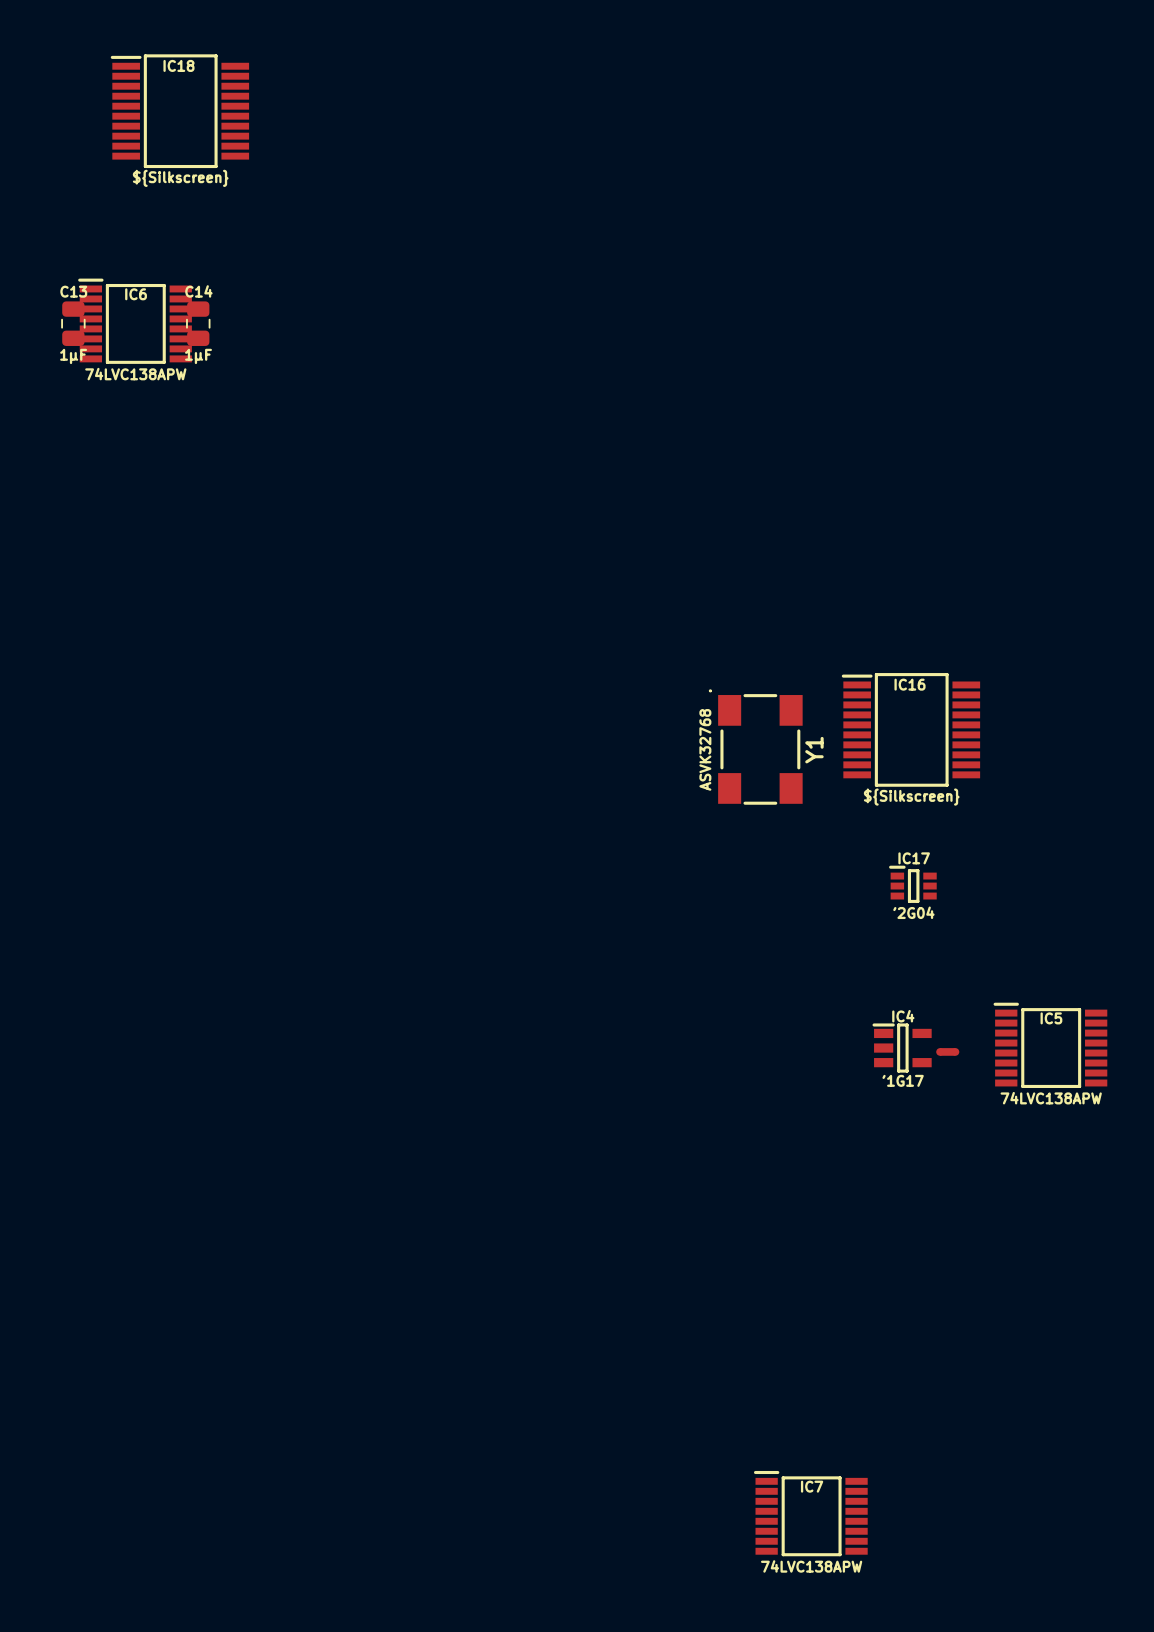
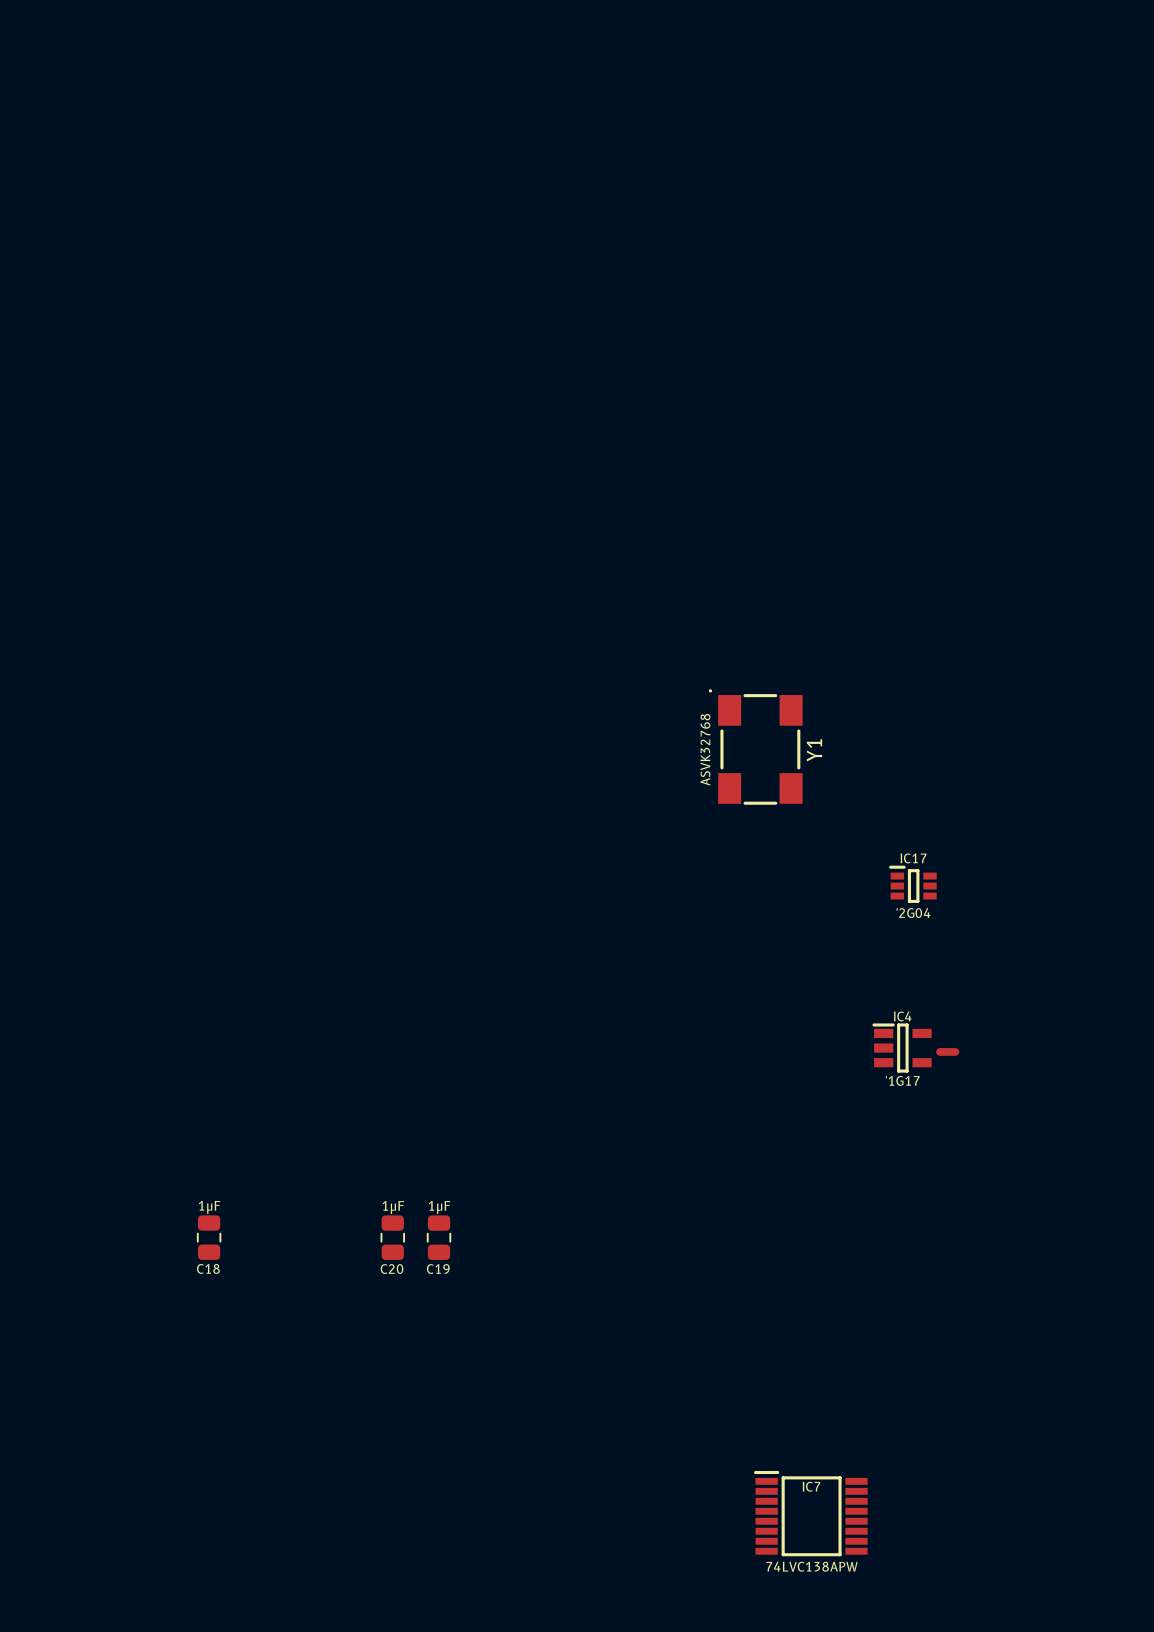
IC18: (179, 111) -> none
IC6: (135, 321) -> none
C13: 1μF (73, 323) -> none
C14: 1μF (198, 323) -> none
IC16: (910, 729) -> none
IC5: (1050, 1045) -> none
C18: none -> 1μF (209, 1237)
C20: none -> 1μF (392, 1237)
C19: none -> 1μF (439, 1237)

